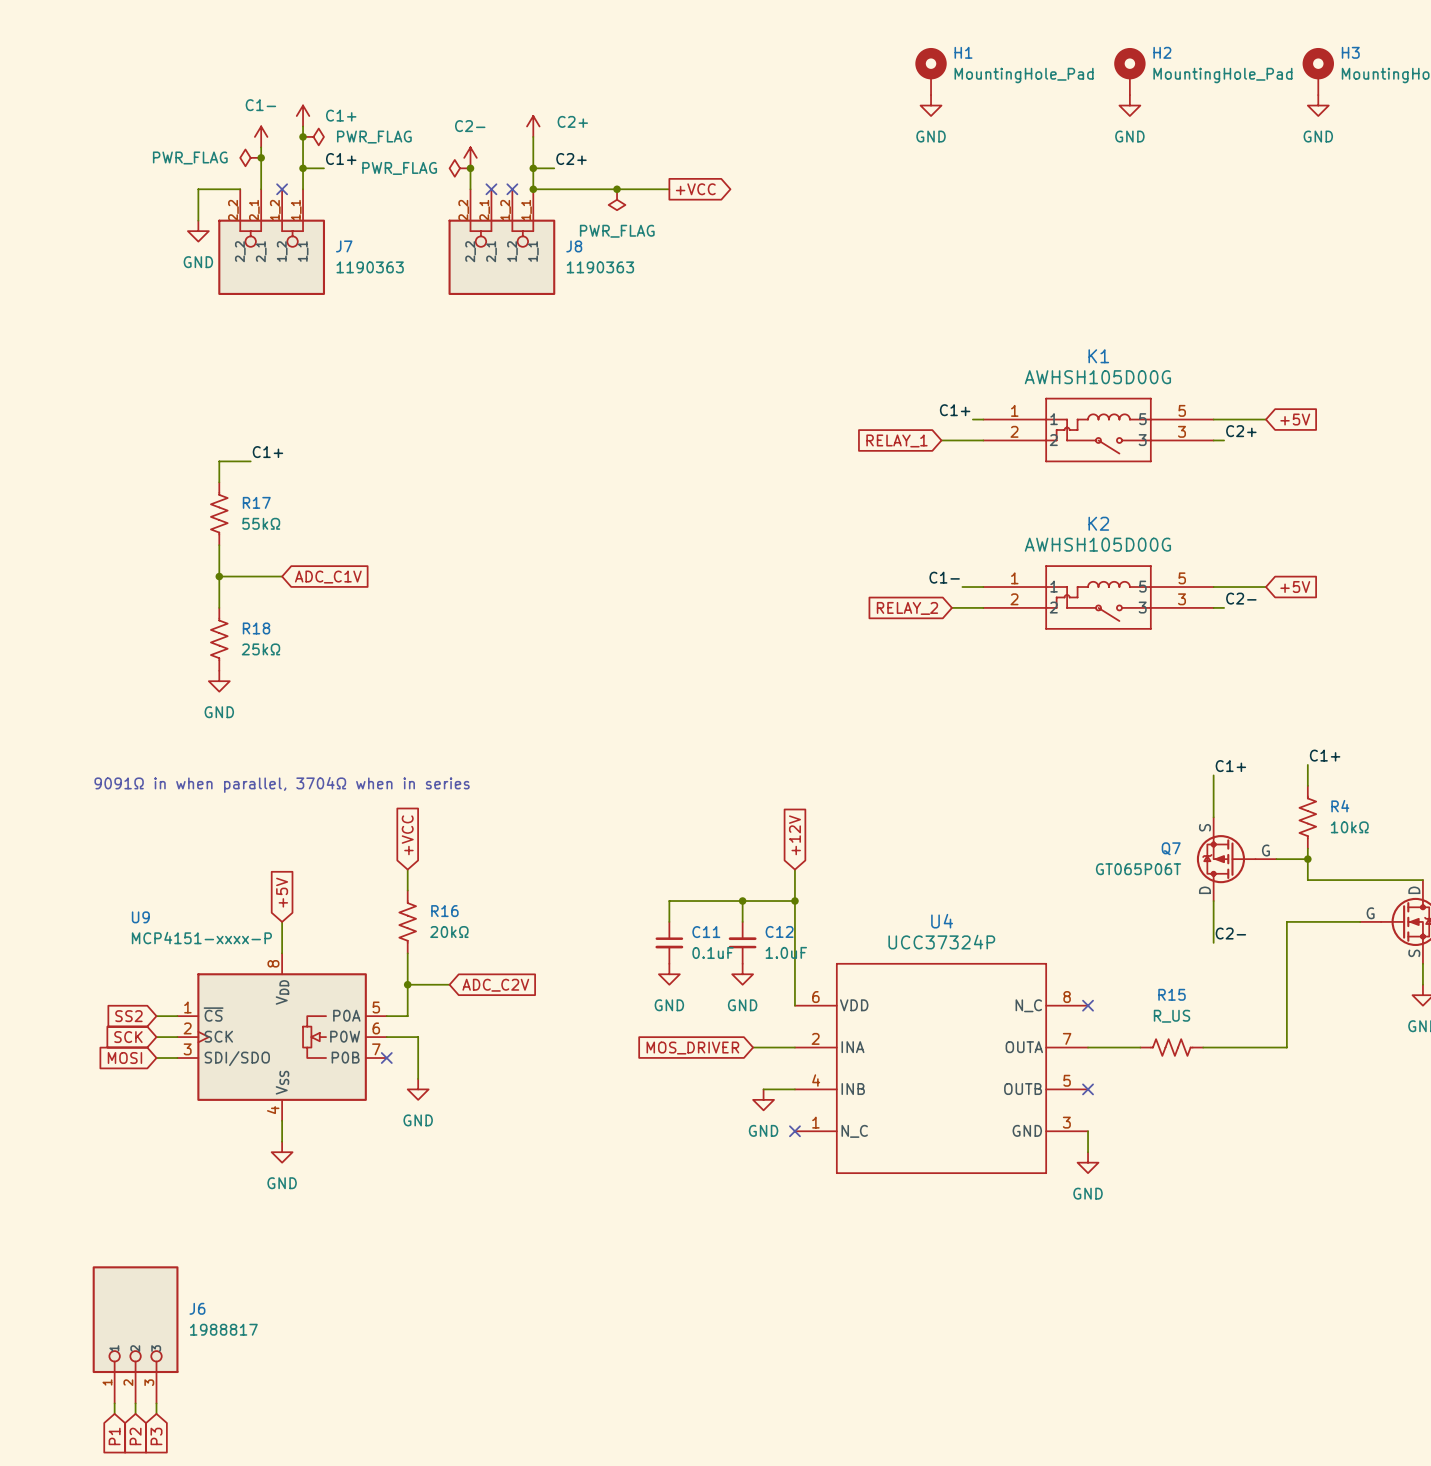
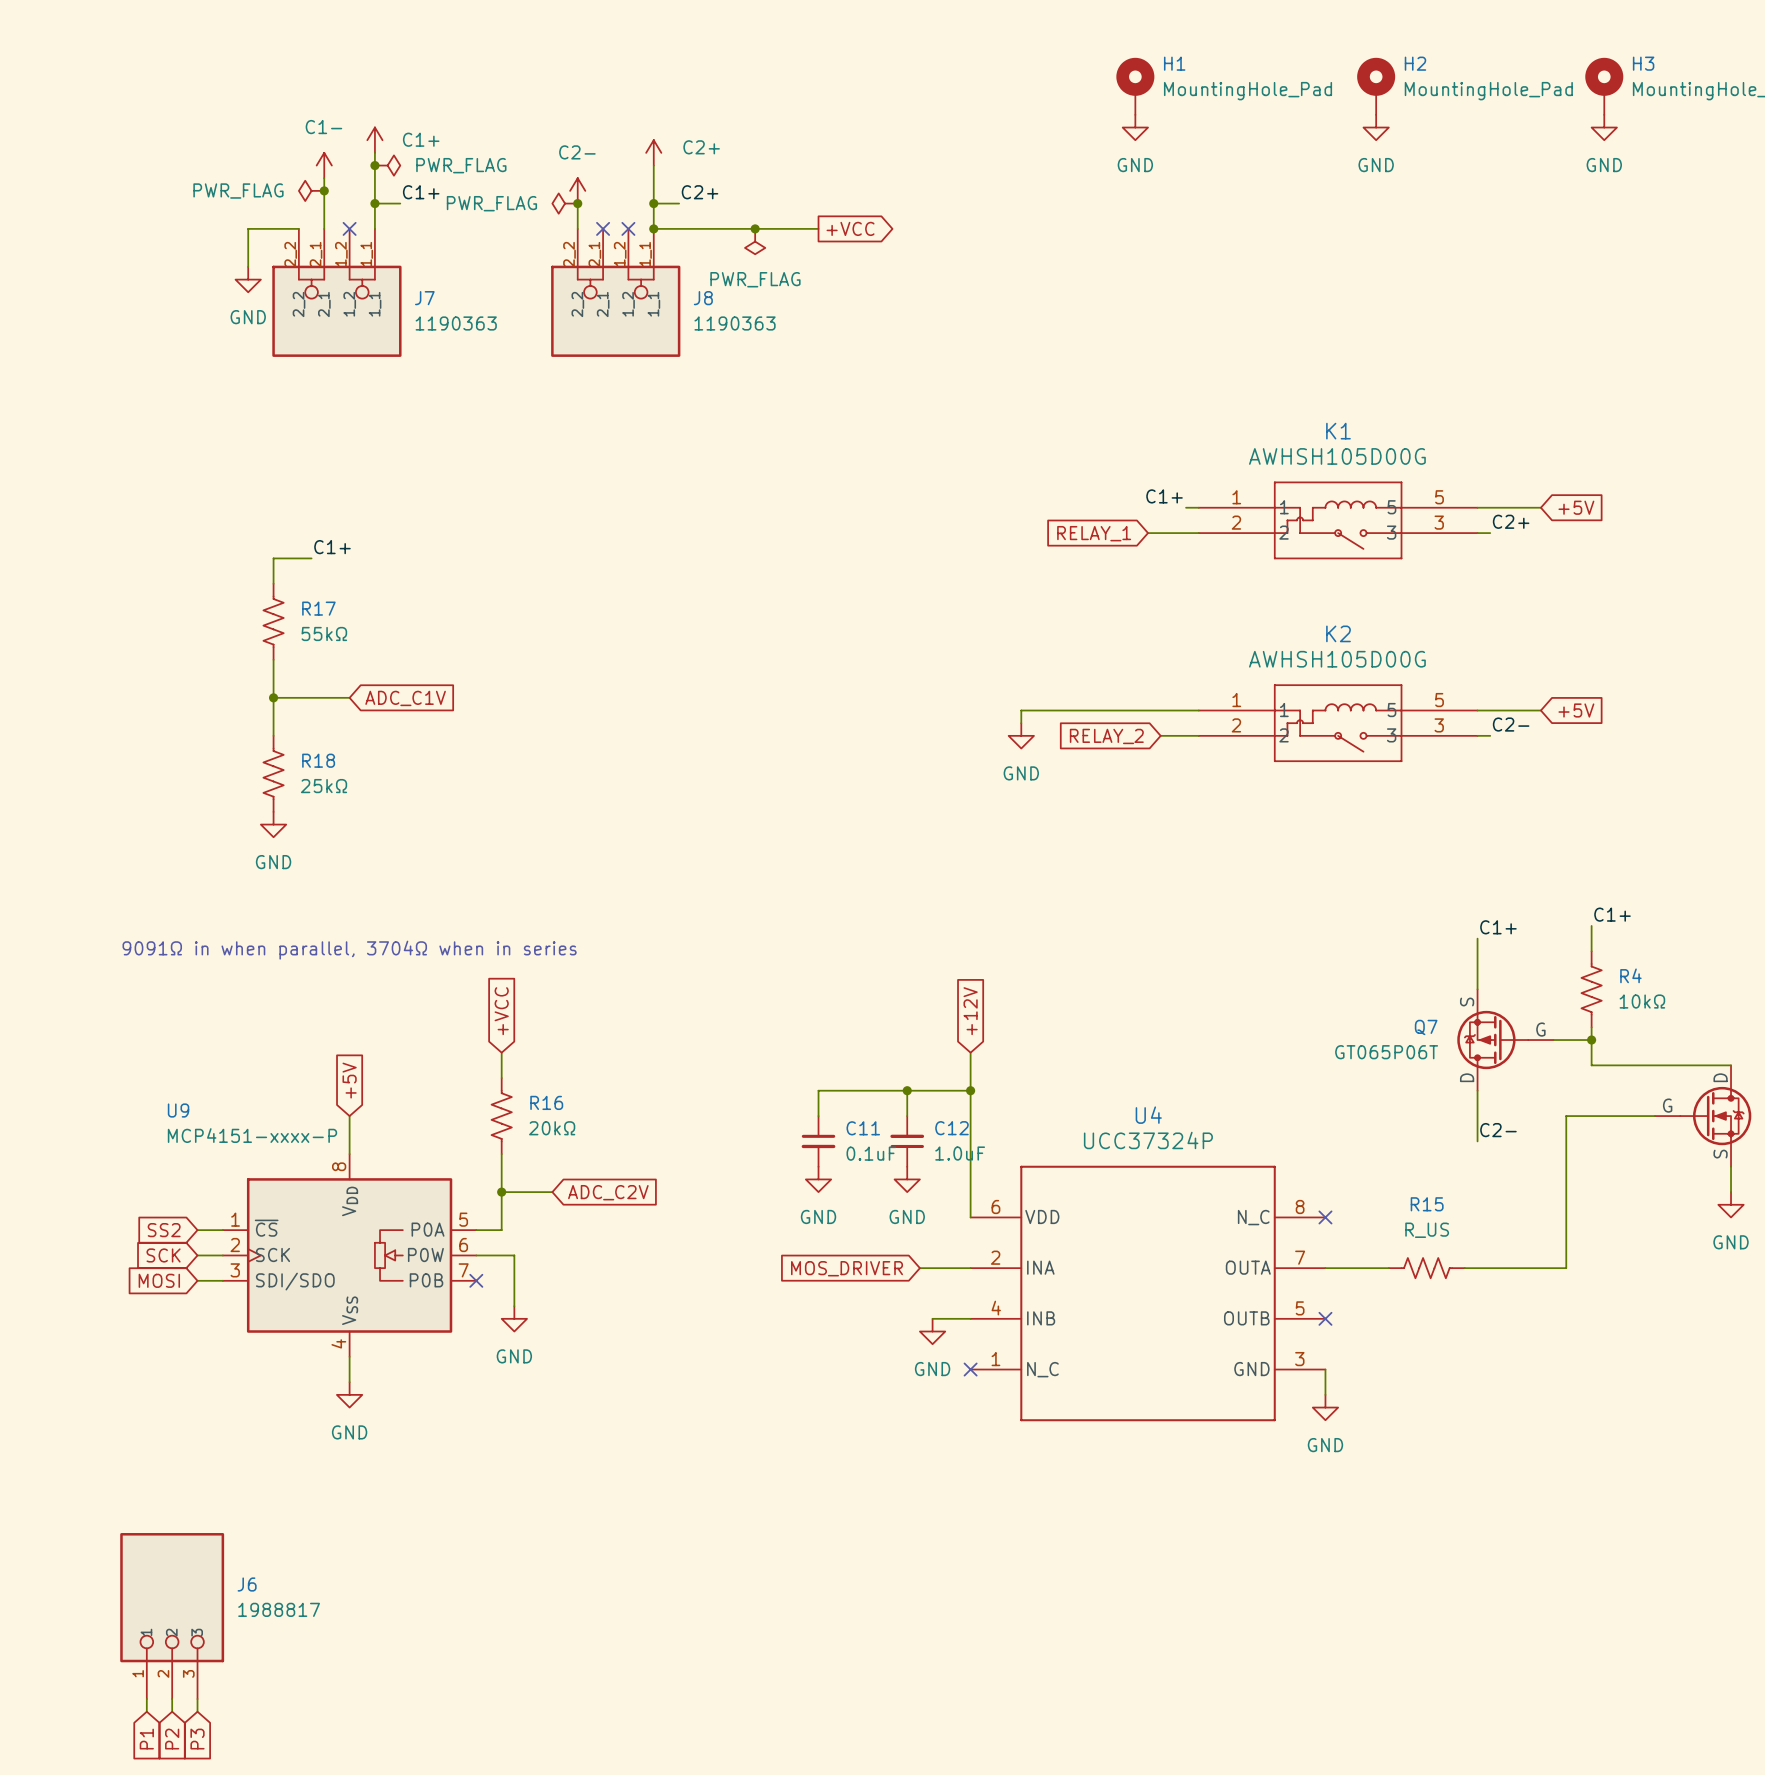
label: C1- (944, 577) -> none
wire: none -> (1173, 710) (1021, 710) (1021, 723)
power symbol: none -> GND (1021, 735)

